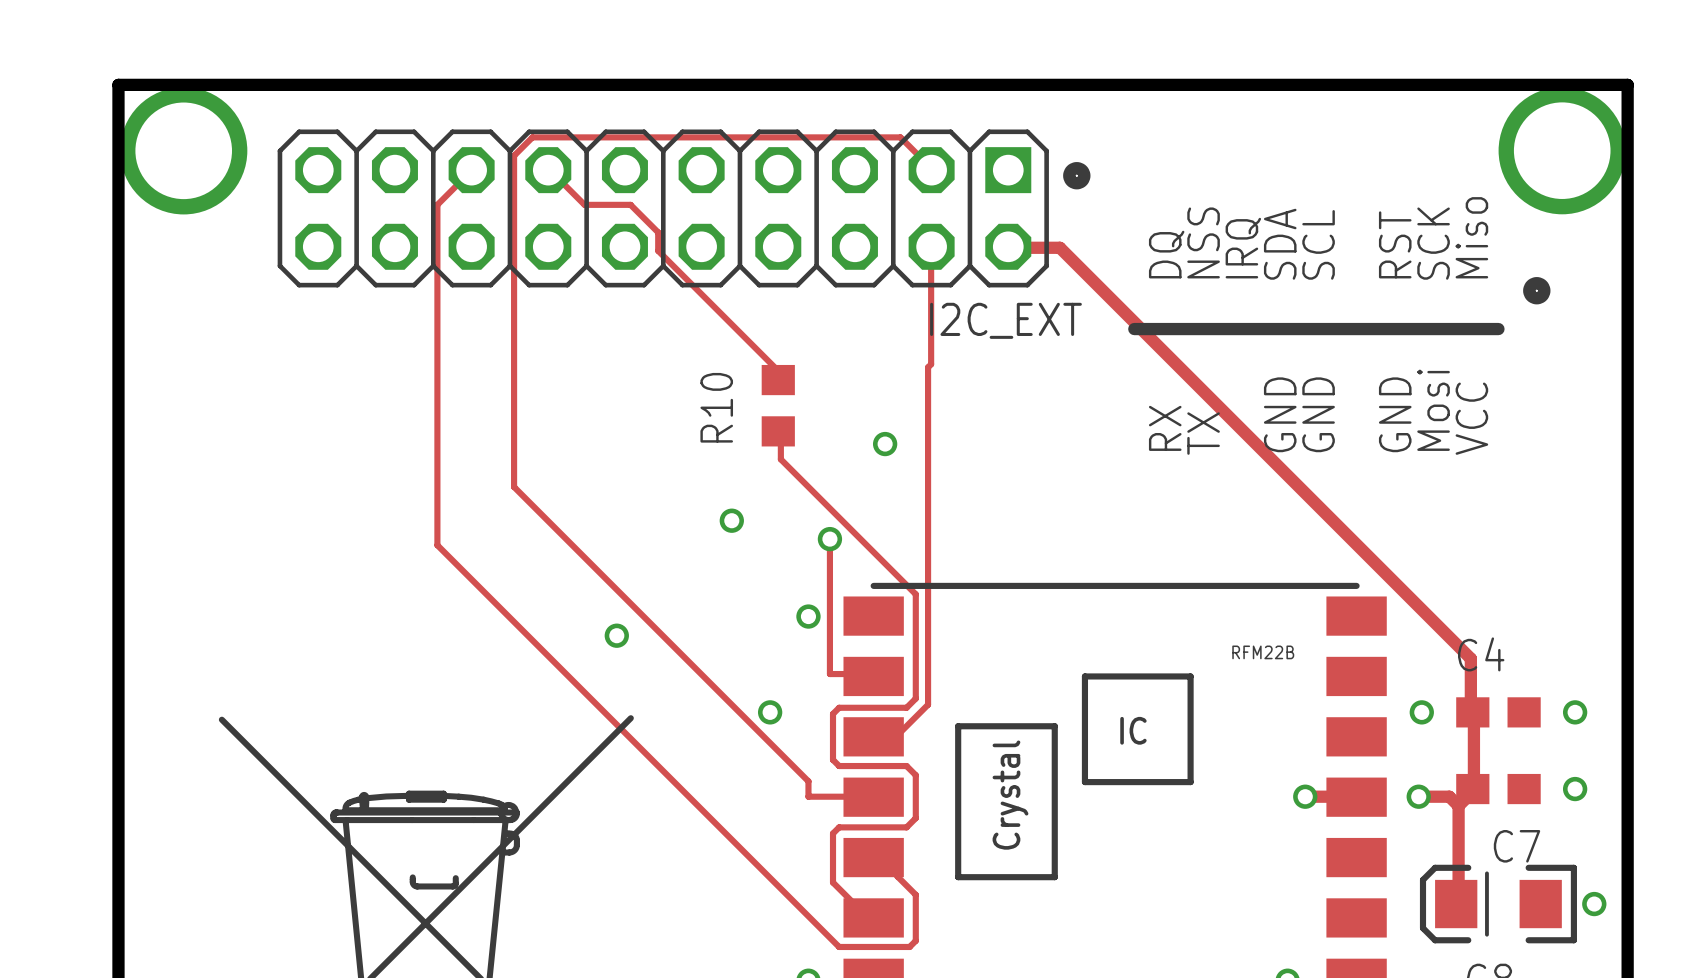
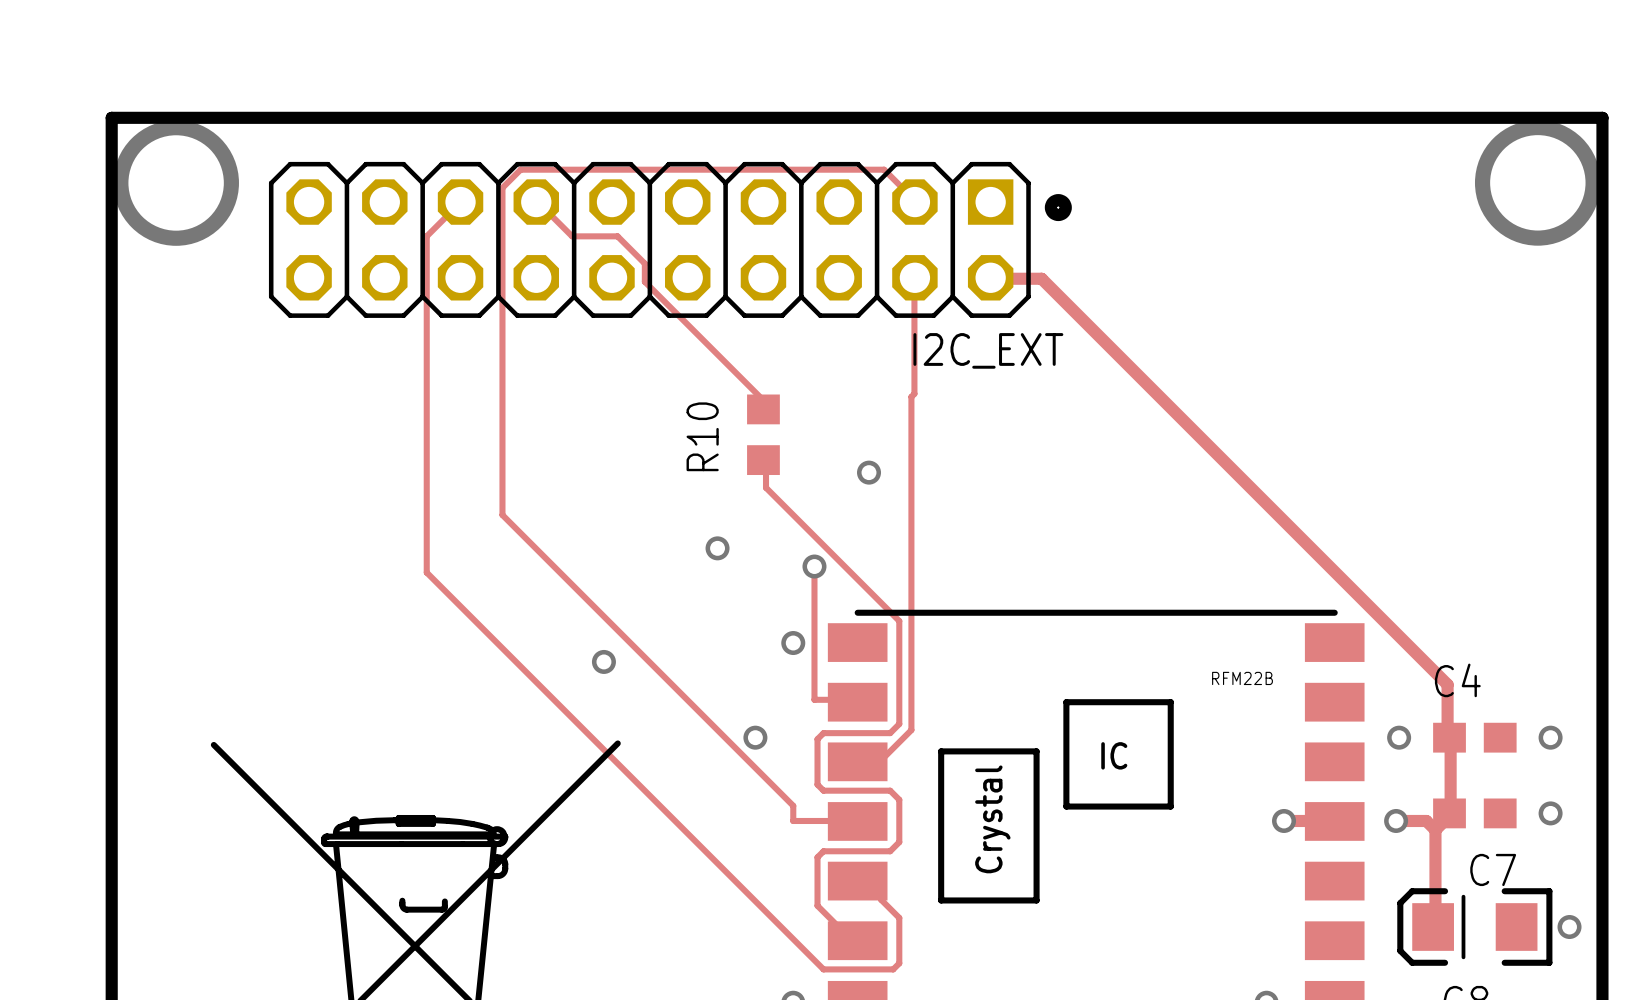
text: Miso (1471, 237) -> none
text: NSS (1203, 242) -> none
text: SCK (1433, 243) -> none
text: SDA (1280, 244) -> none
text: SCL (1318, 244) -> none
text: RST (1395, 244) -> none
text: IRQ (1243, 248) -> none
text: DQ (1166, 254) -> none
drawing: [1523, 277, 1551, 305] -> none
line: (1134, 329) (1498, 329) -> none
text: Mosi (1433, 410) -> none
text: GND (1280, 414) -> none
text: GND (1318, 414) -> none
text: GND (1395, 414) -> none
text: VCC (1471, 418) -> none
text: RX (1165, 428) -> none
text: TX (1203, 433) -> none

